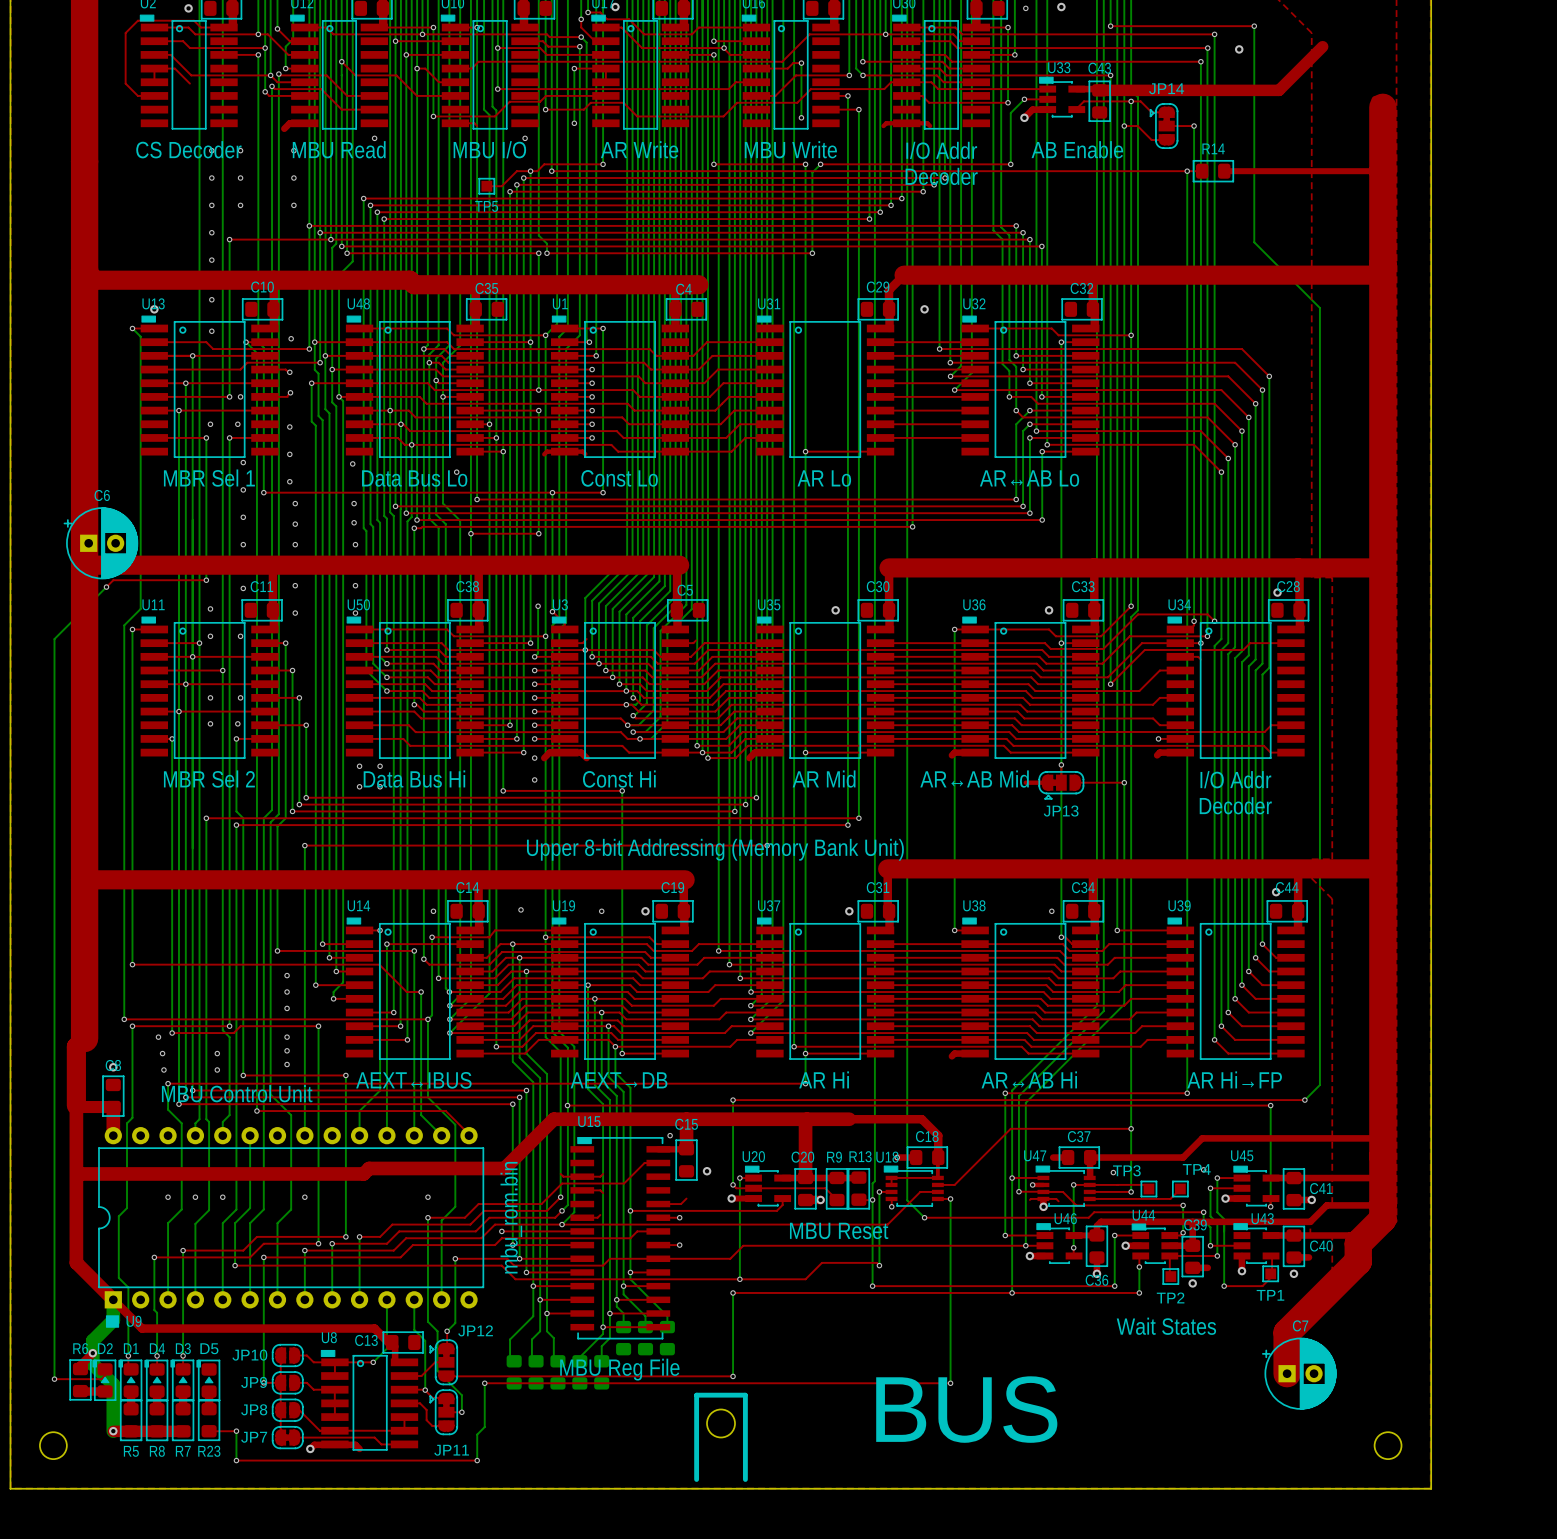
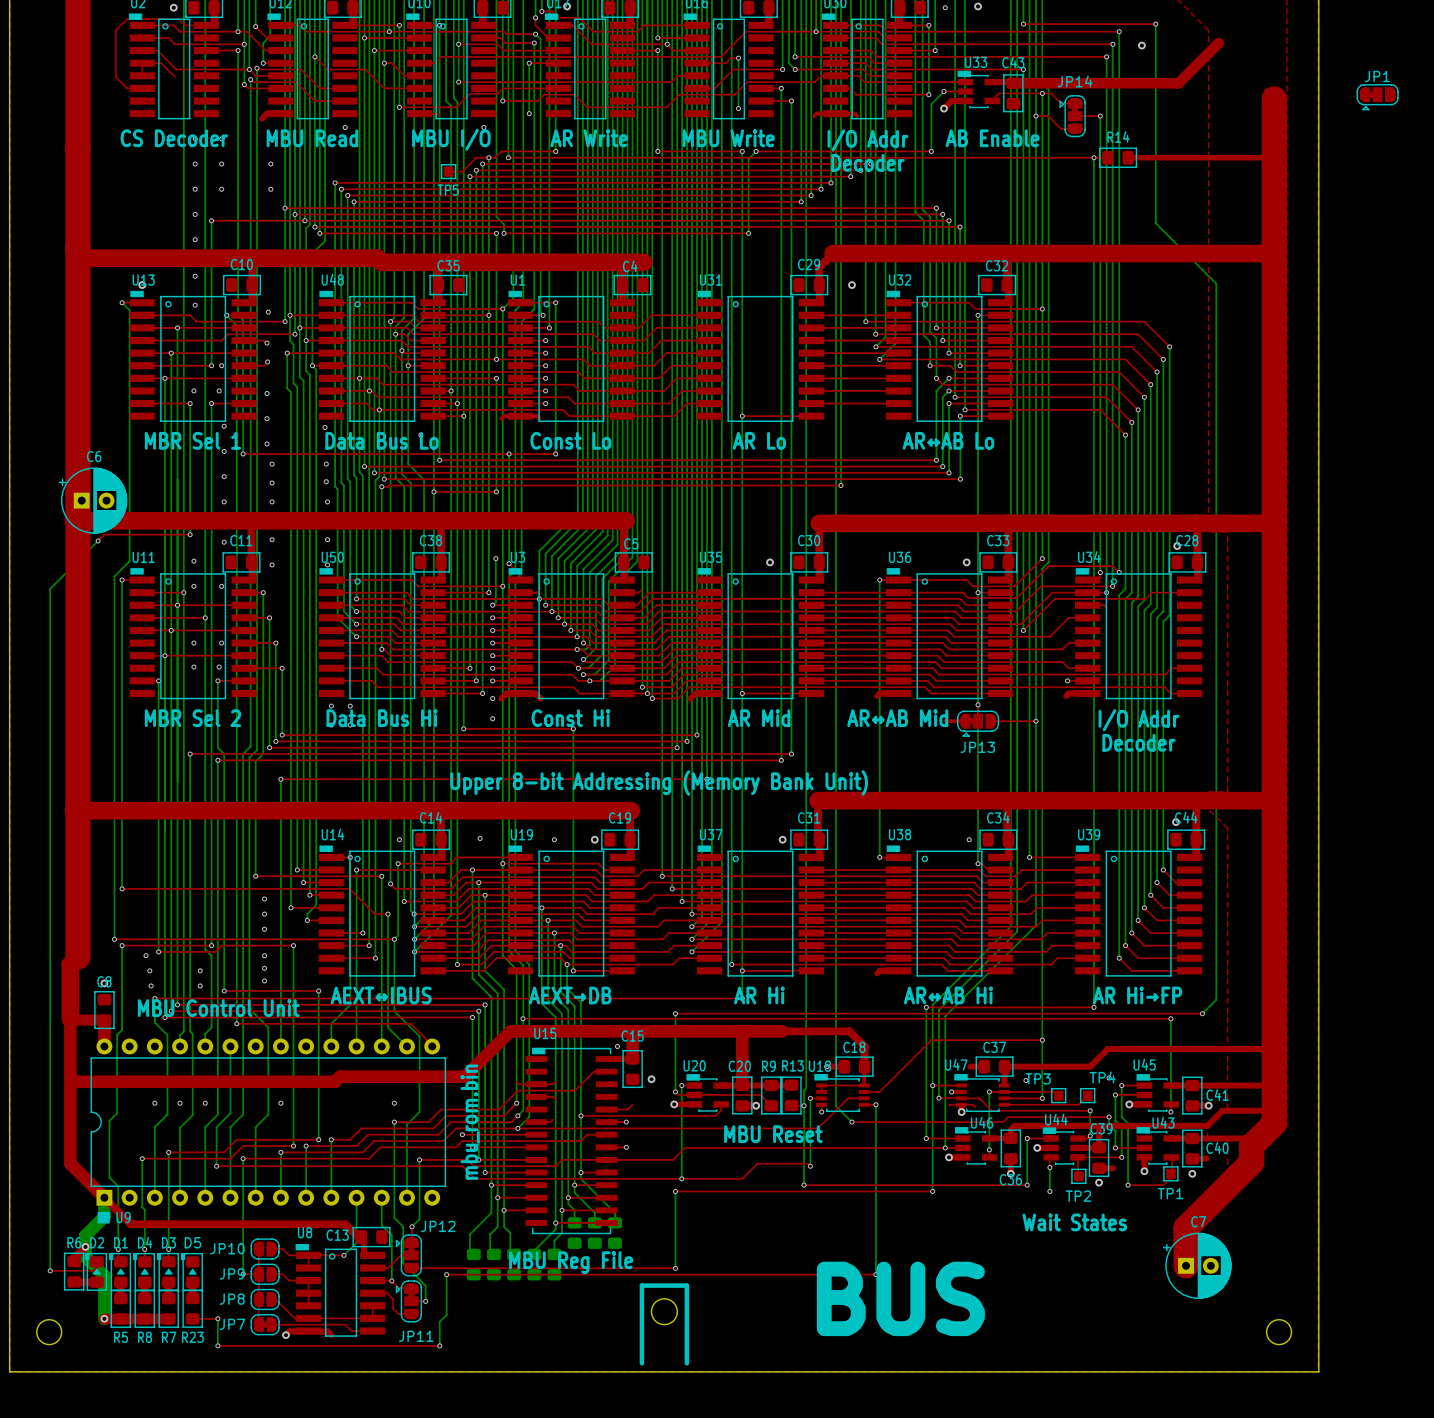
JP1: none -> (1377, 97)
top track: (1012, 1292) (1139, 1292) -> none

